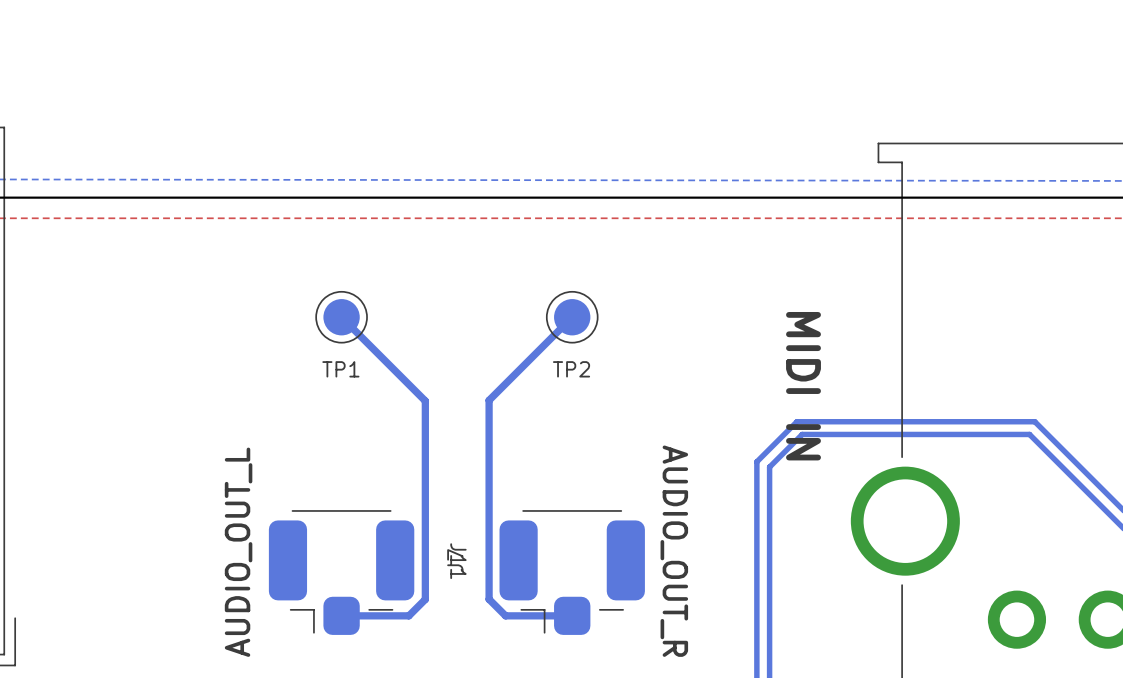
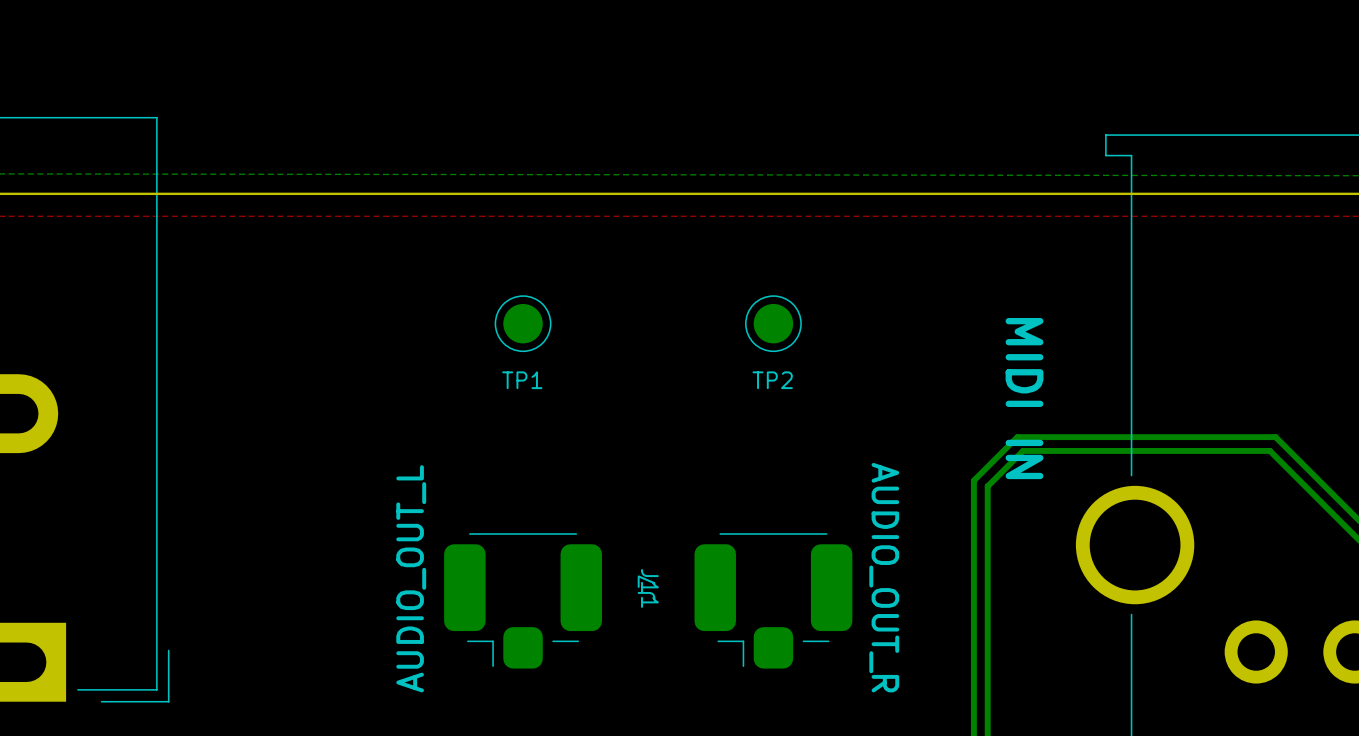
bottom track: (341, 317) (425, 400) (425, 599) (408, 615) (341, 615) -> none
bottom track: (572, 317) (489, 400) (489, 599) (505, 615) (572, 615) -> none

